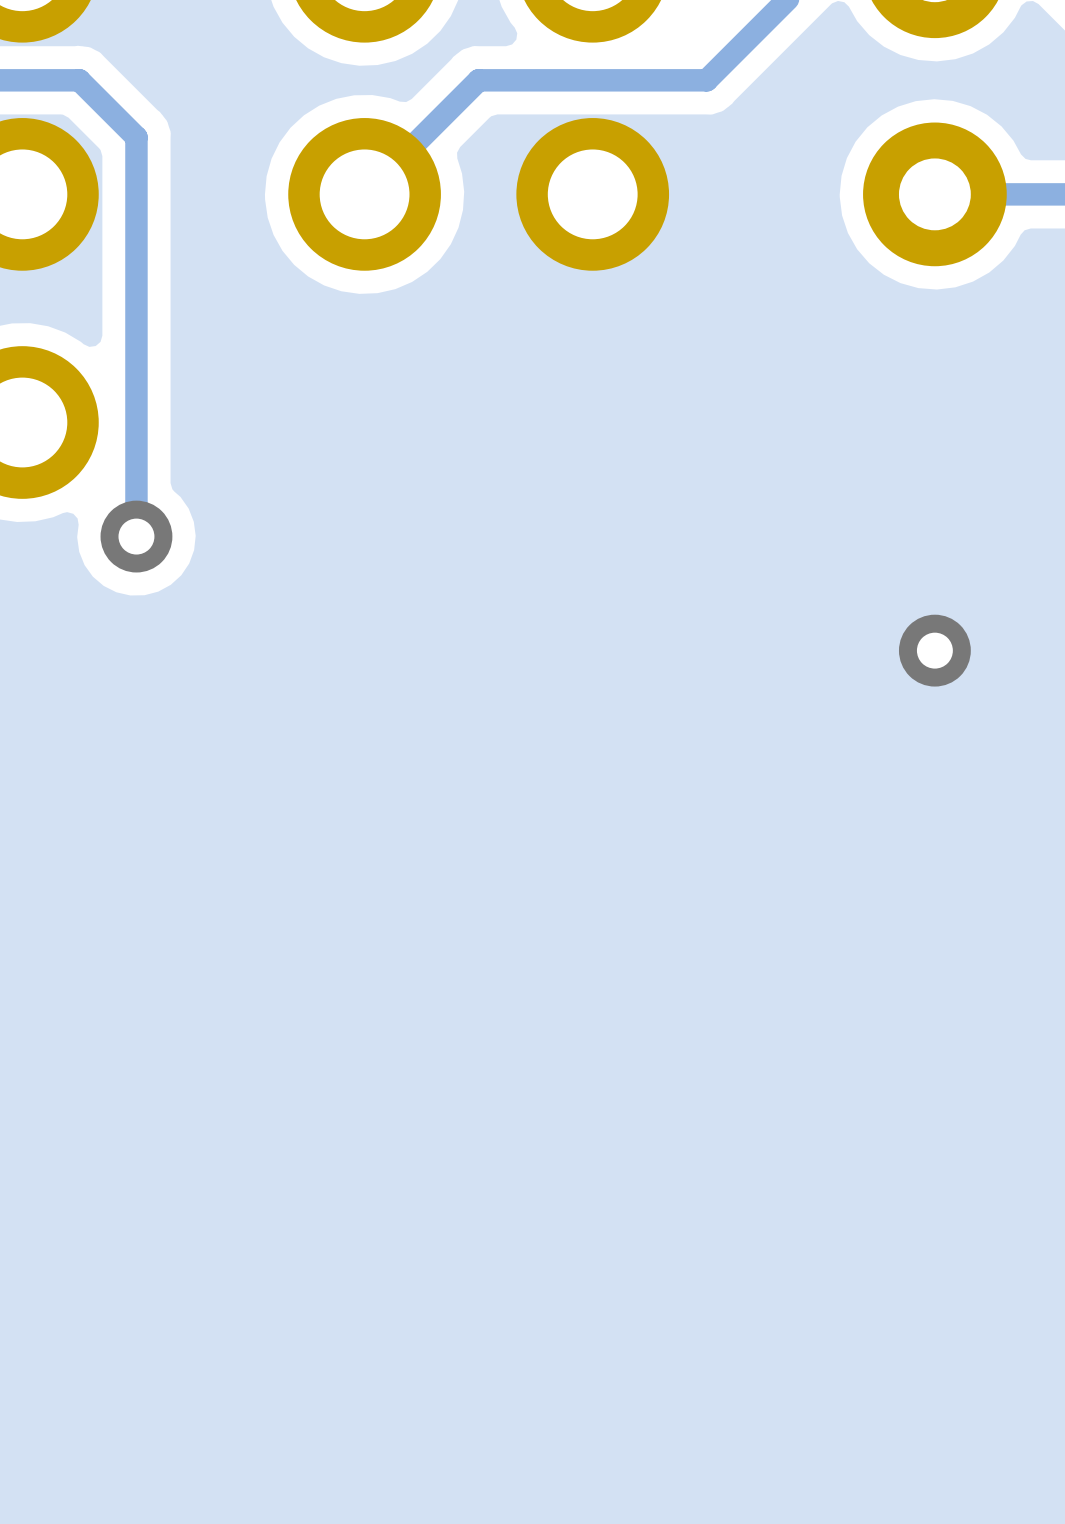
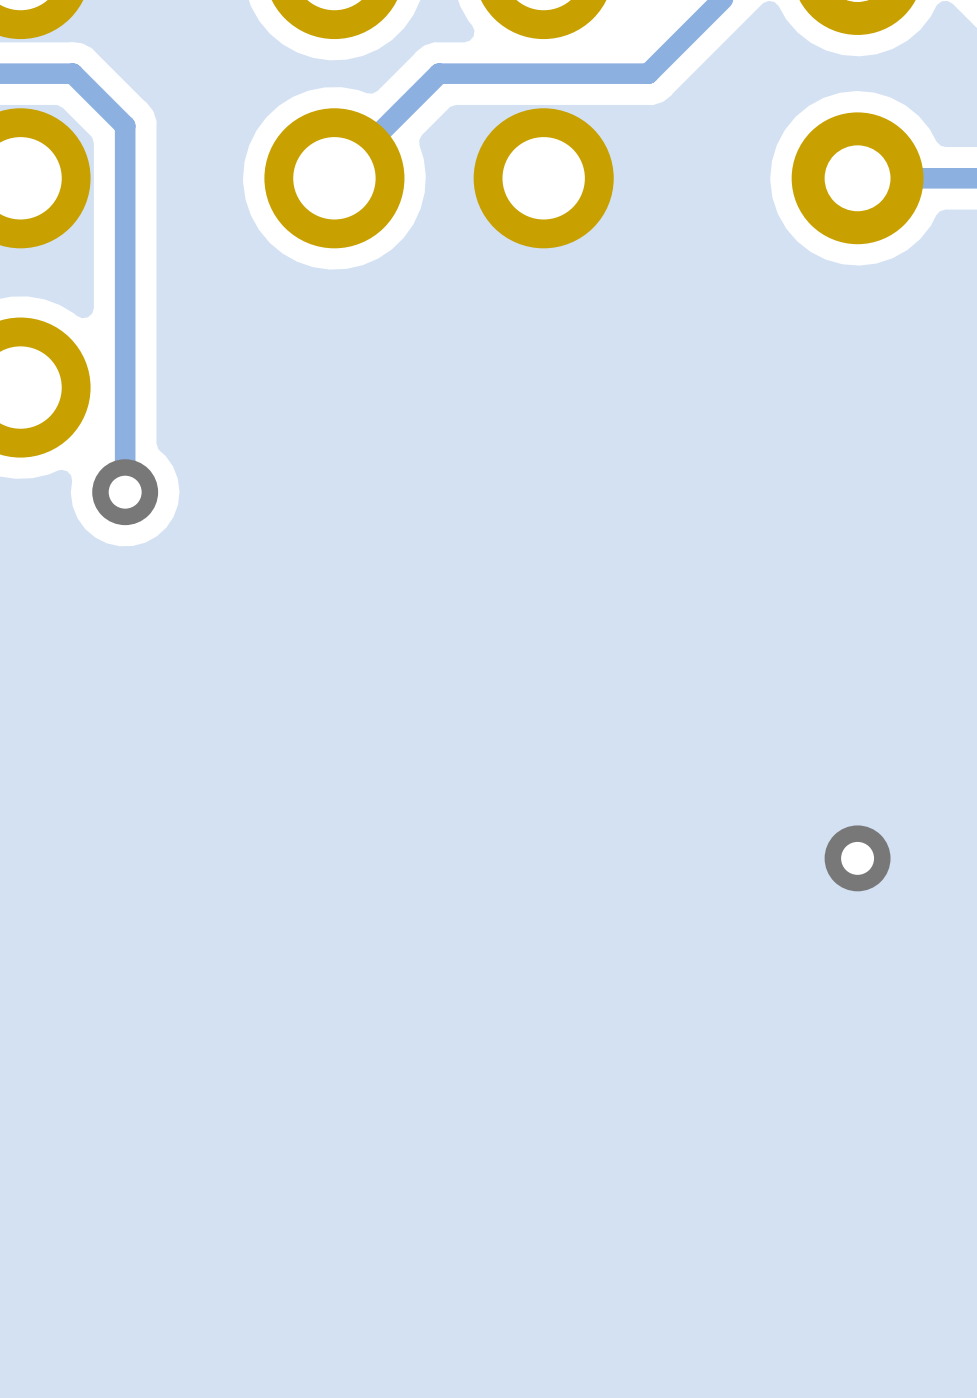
via position: (934, 650) -> (857, 858)

